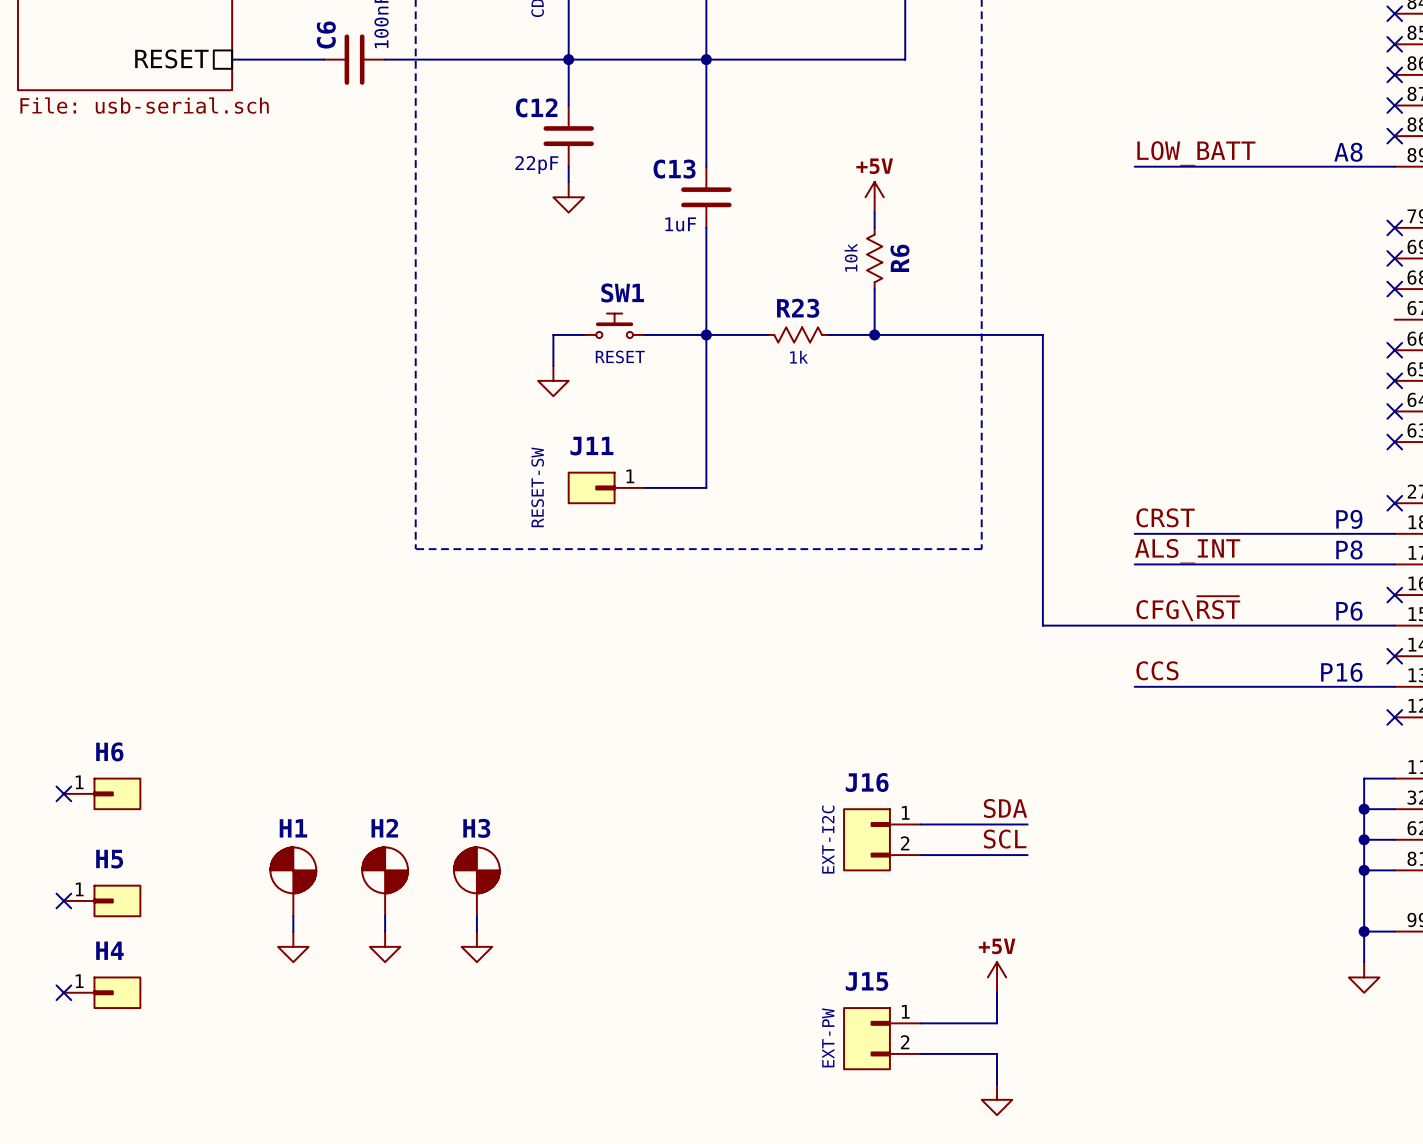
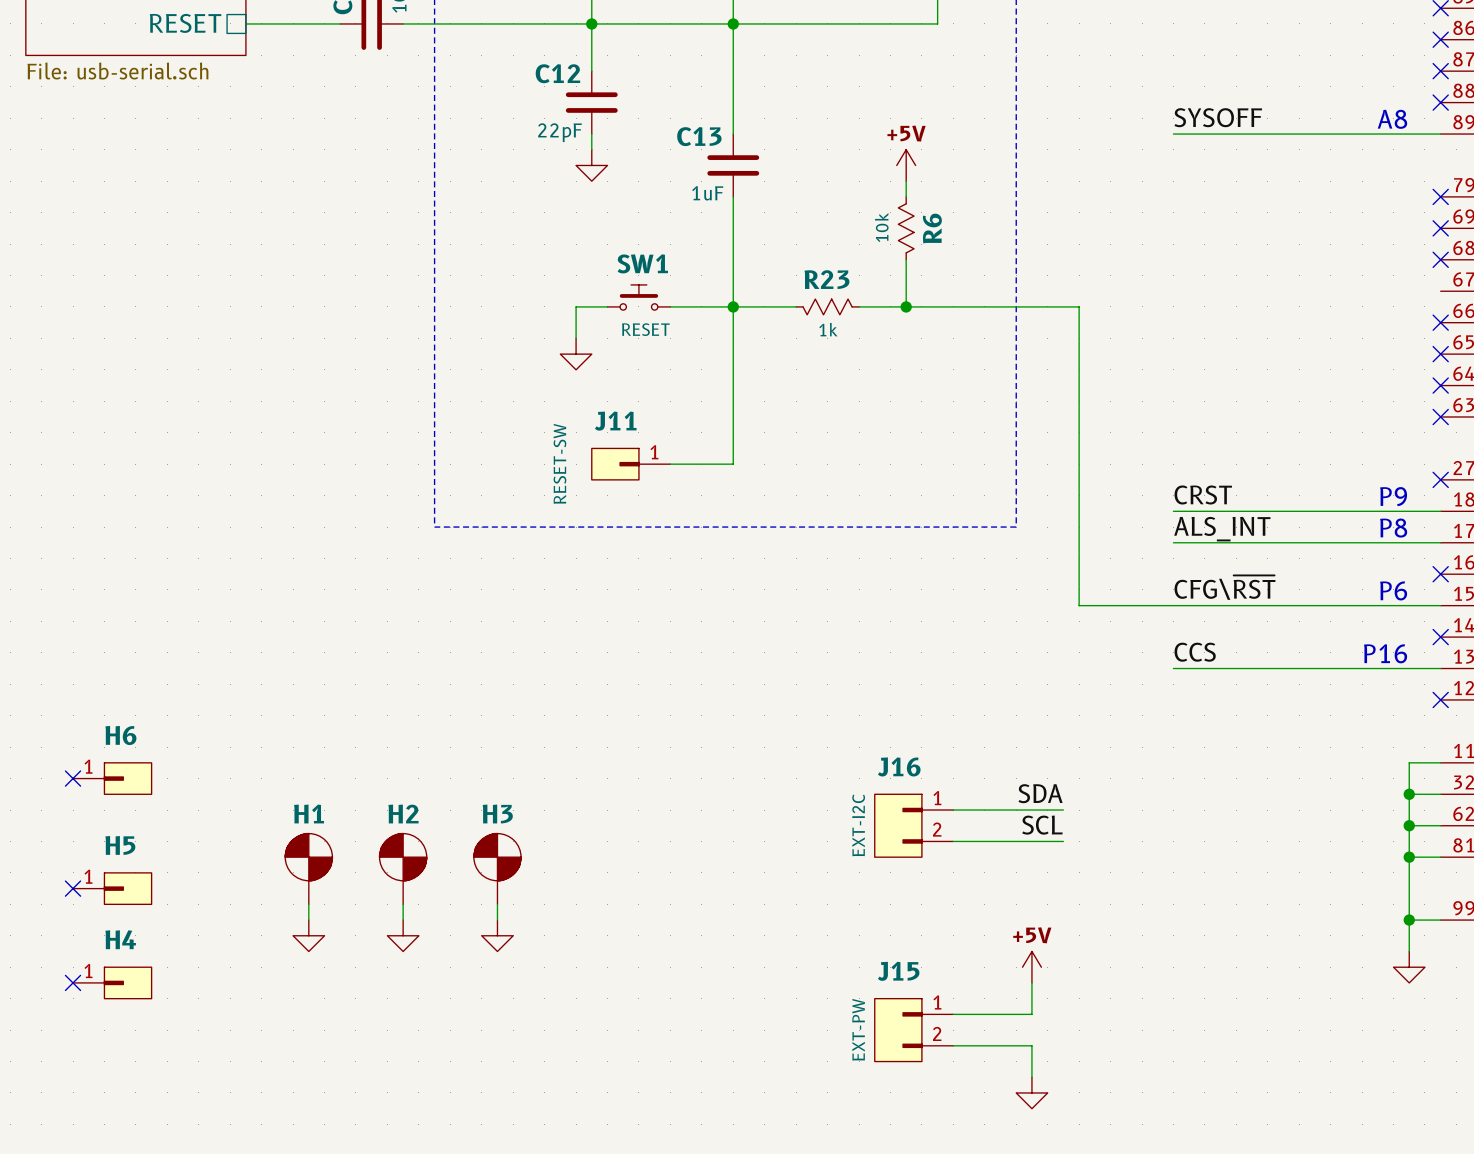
label: LOW_BATT (1196, 153) -> SYSOFF (1218, 117)

